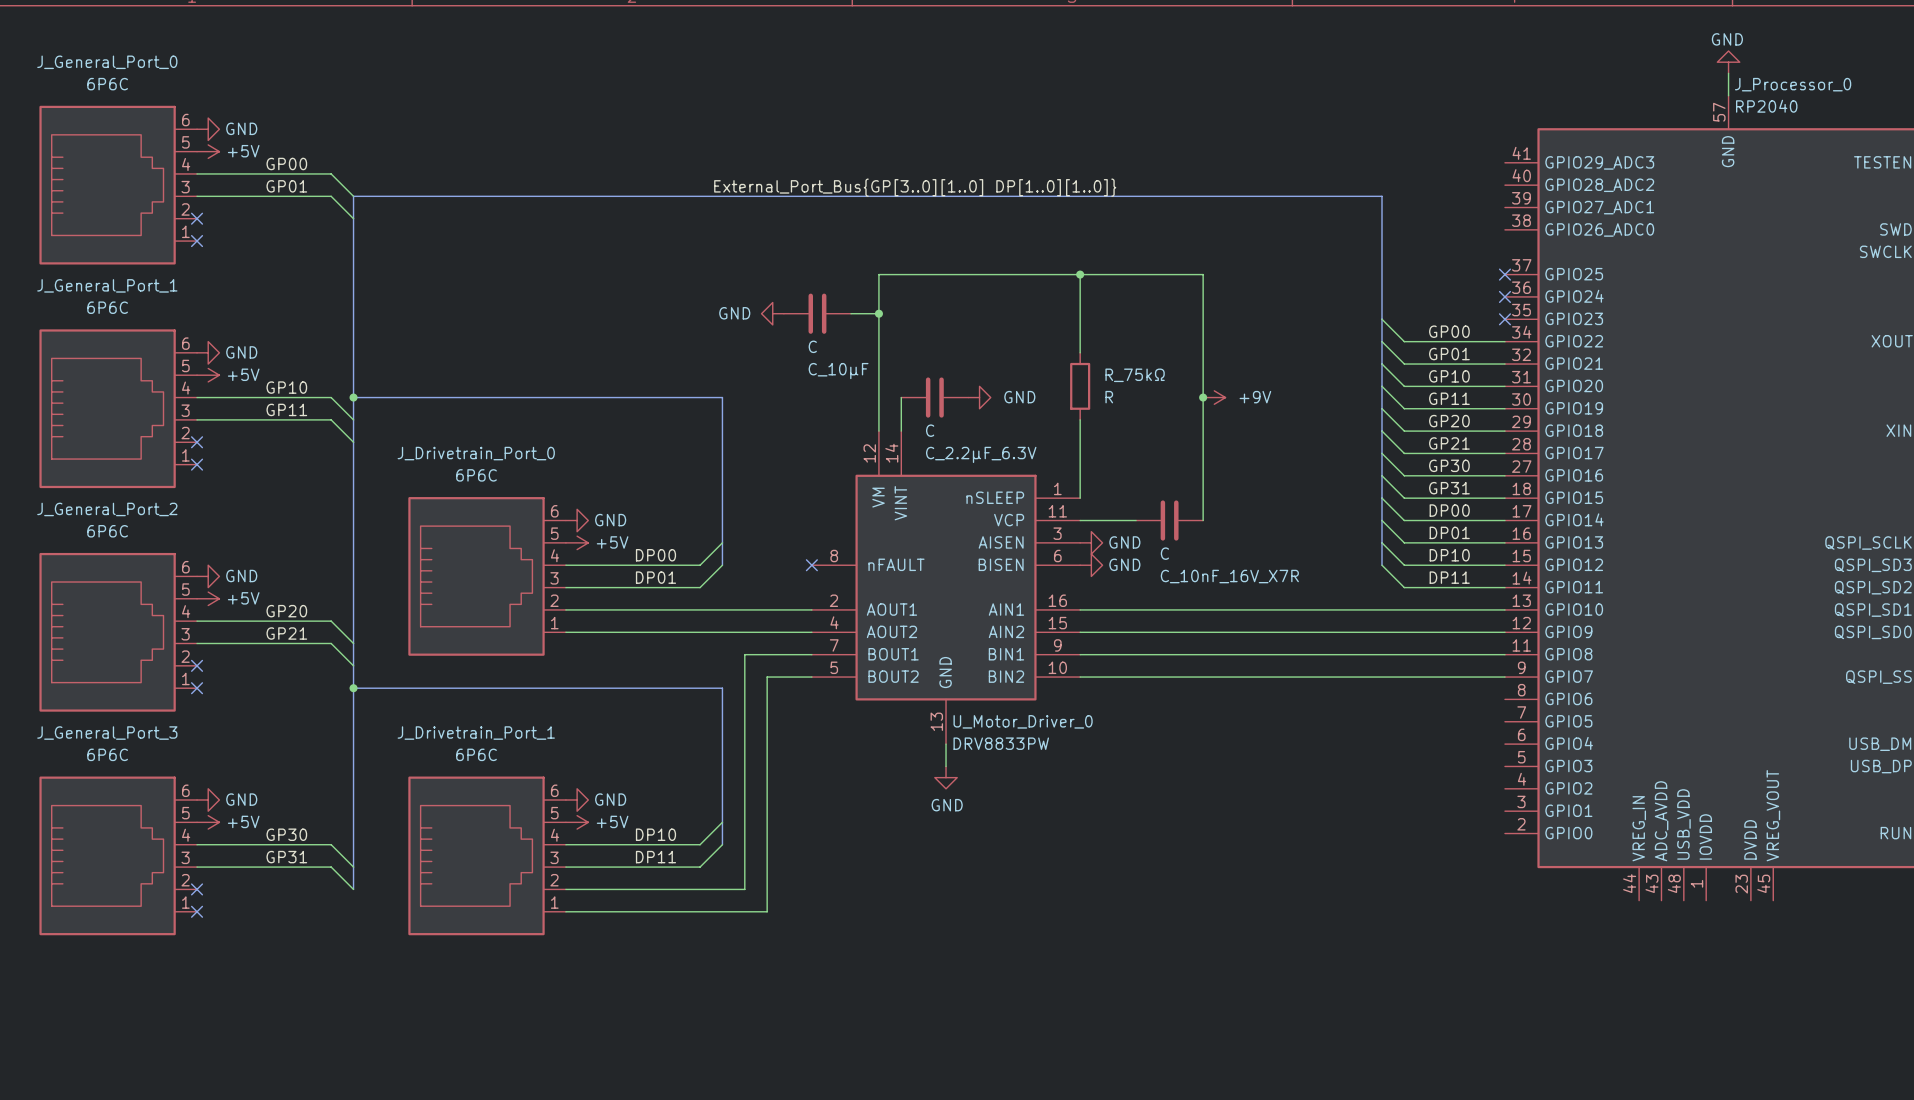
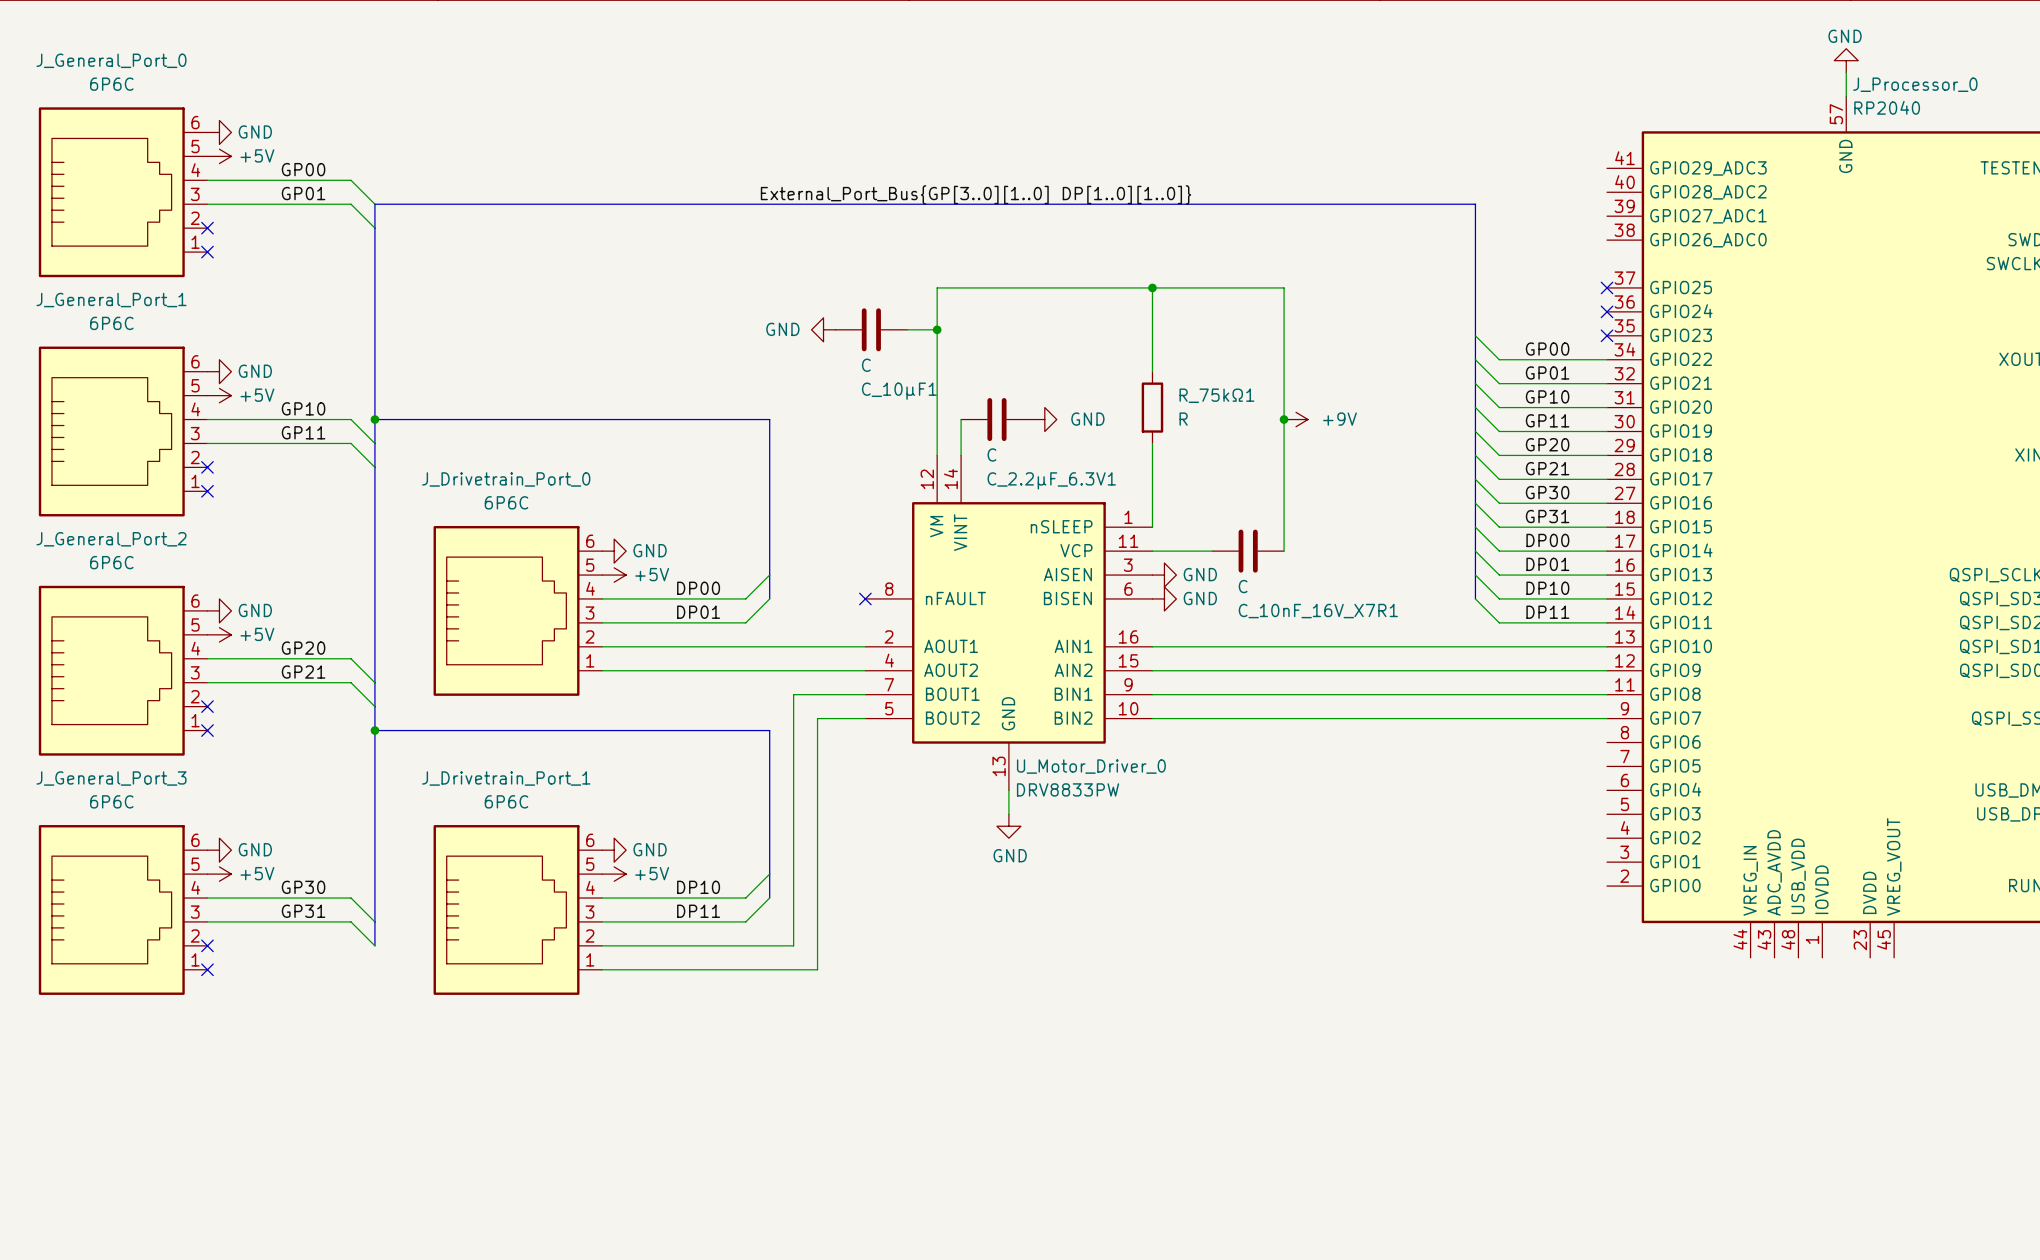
C_10μF name: C_10μF (838, 371) -> C_10μF1 (899, 391)
R_75kΩ name: R_75kΩ (1135, 375) -> R_75kΩ1 (1216, 395)
C_2.2μF_6.3V name: C_2.2μF_6.3V (981, 454) -> C_2.2μF_6.3V1 (1051, 480)
C_10nF_16V_X7R name: C_10nF_16V_X7R (1229, 576) -> C_10nF_16V_X7R1 (1318, 611)

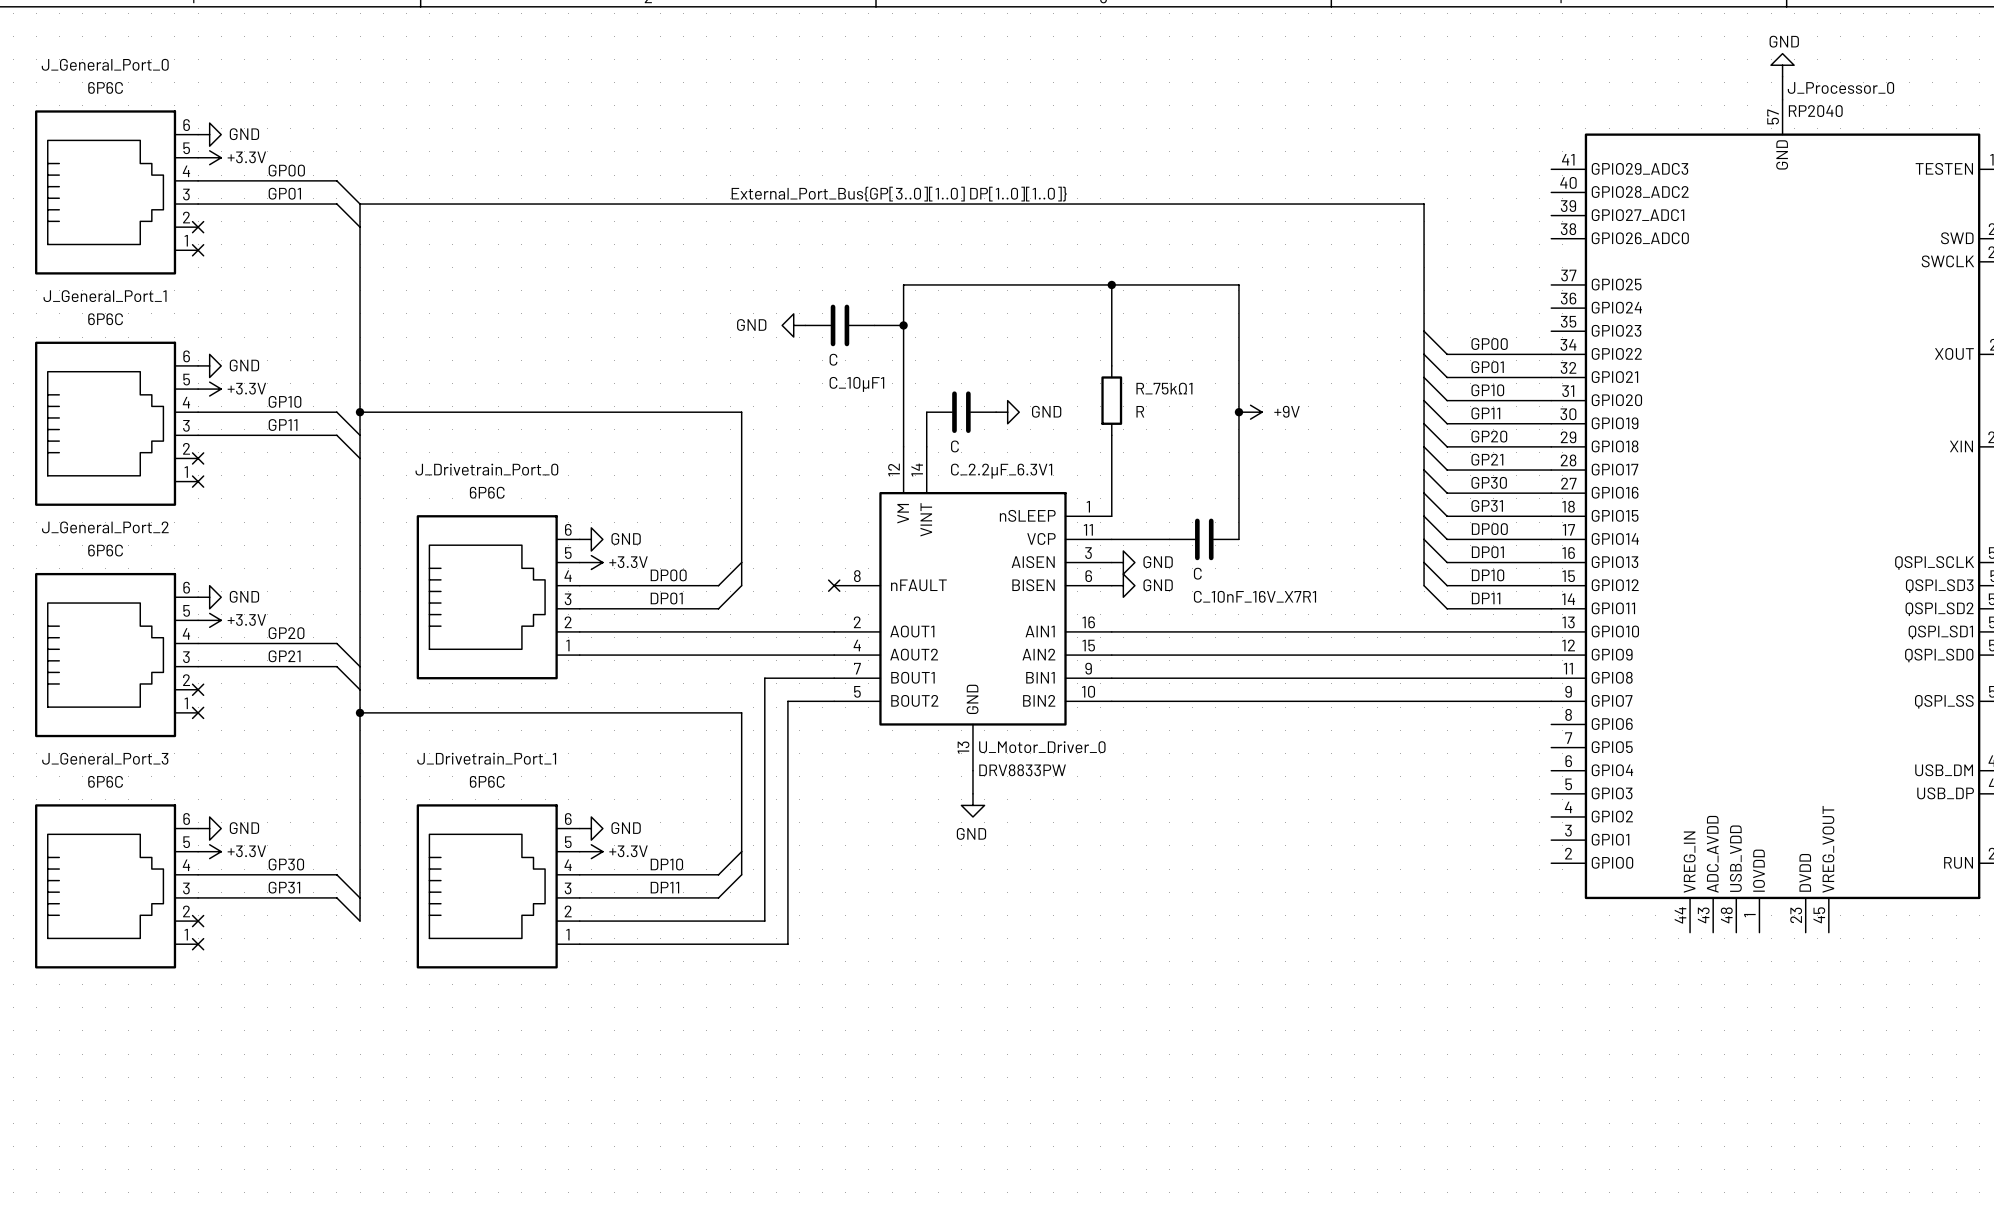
power symbol: +5V (219, 156) -> +3.3V (209, 157)
no-connect mark: (1607, 287) -> none
no-connect mark: (1607, 311) -> none
no-connect mark: (1607, 335) -> none
power symbol: +5V (219, 395) -> +3.3V (209, 389)
power symbol: +5V (614, 575) -> +3.3V (591, 562)
power symbol: +5V (219, 634) -> +3.3V (209, 620)
power symbol: +5V (219, 874) -> +3.3V (209, 851)
power symbol: +5V (614, 874) -> +3.3V (591, 851)

